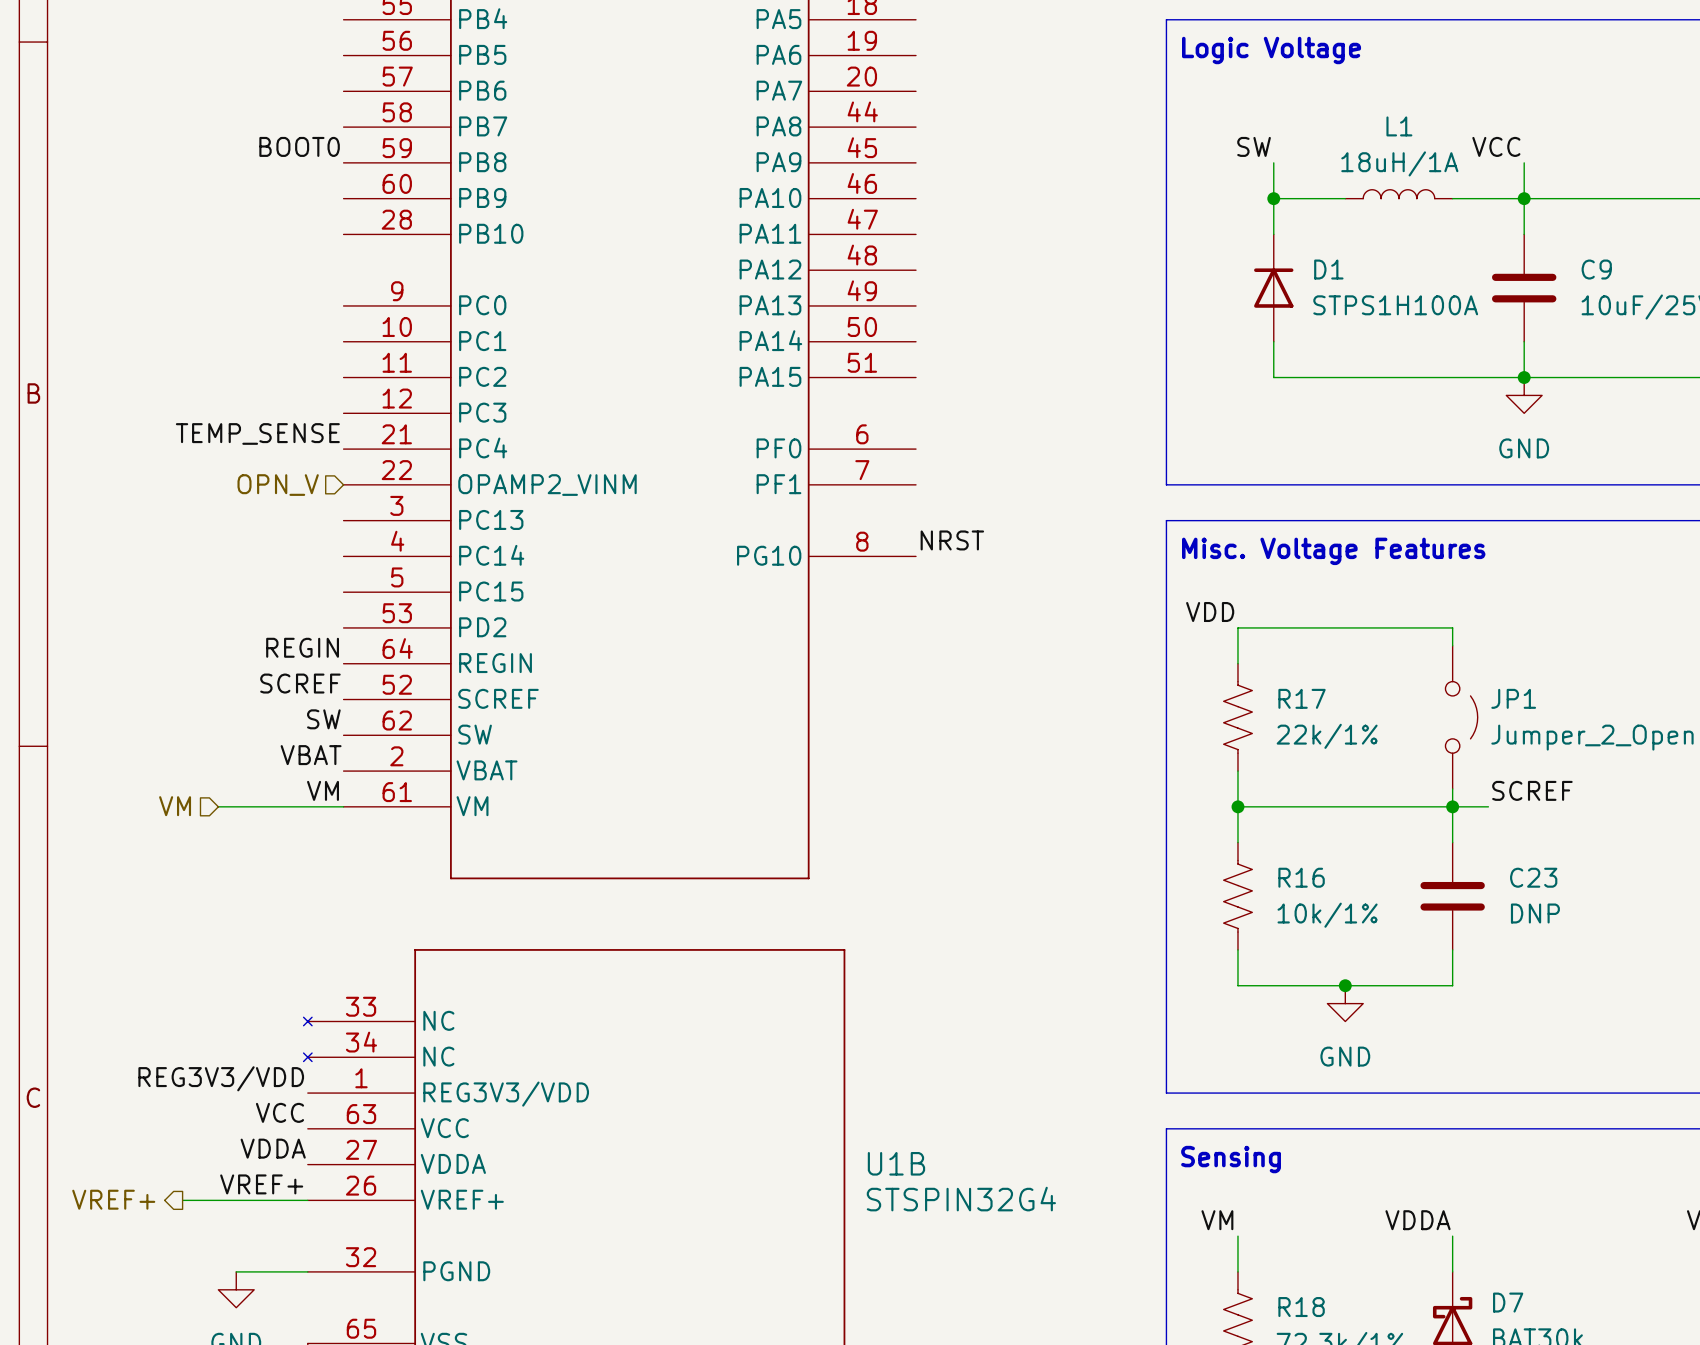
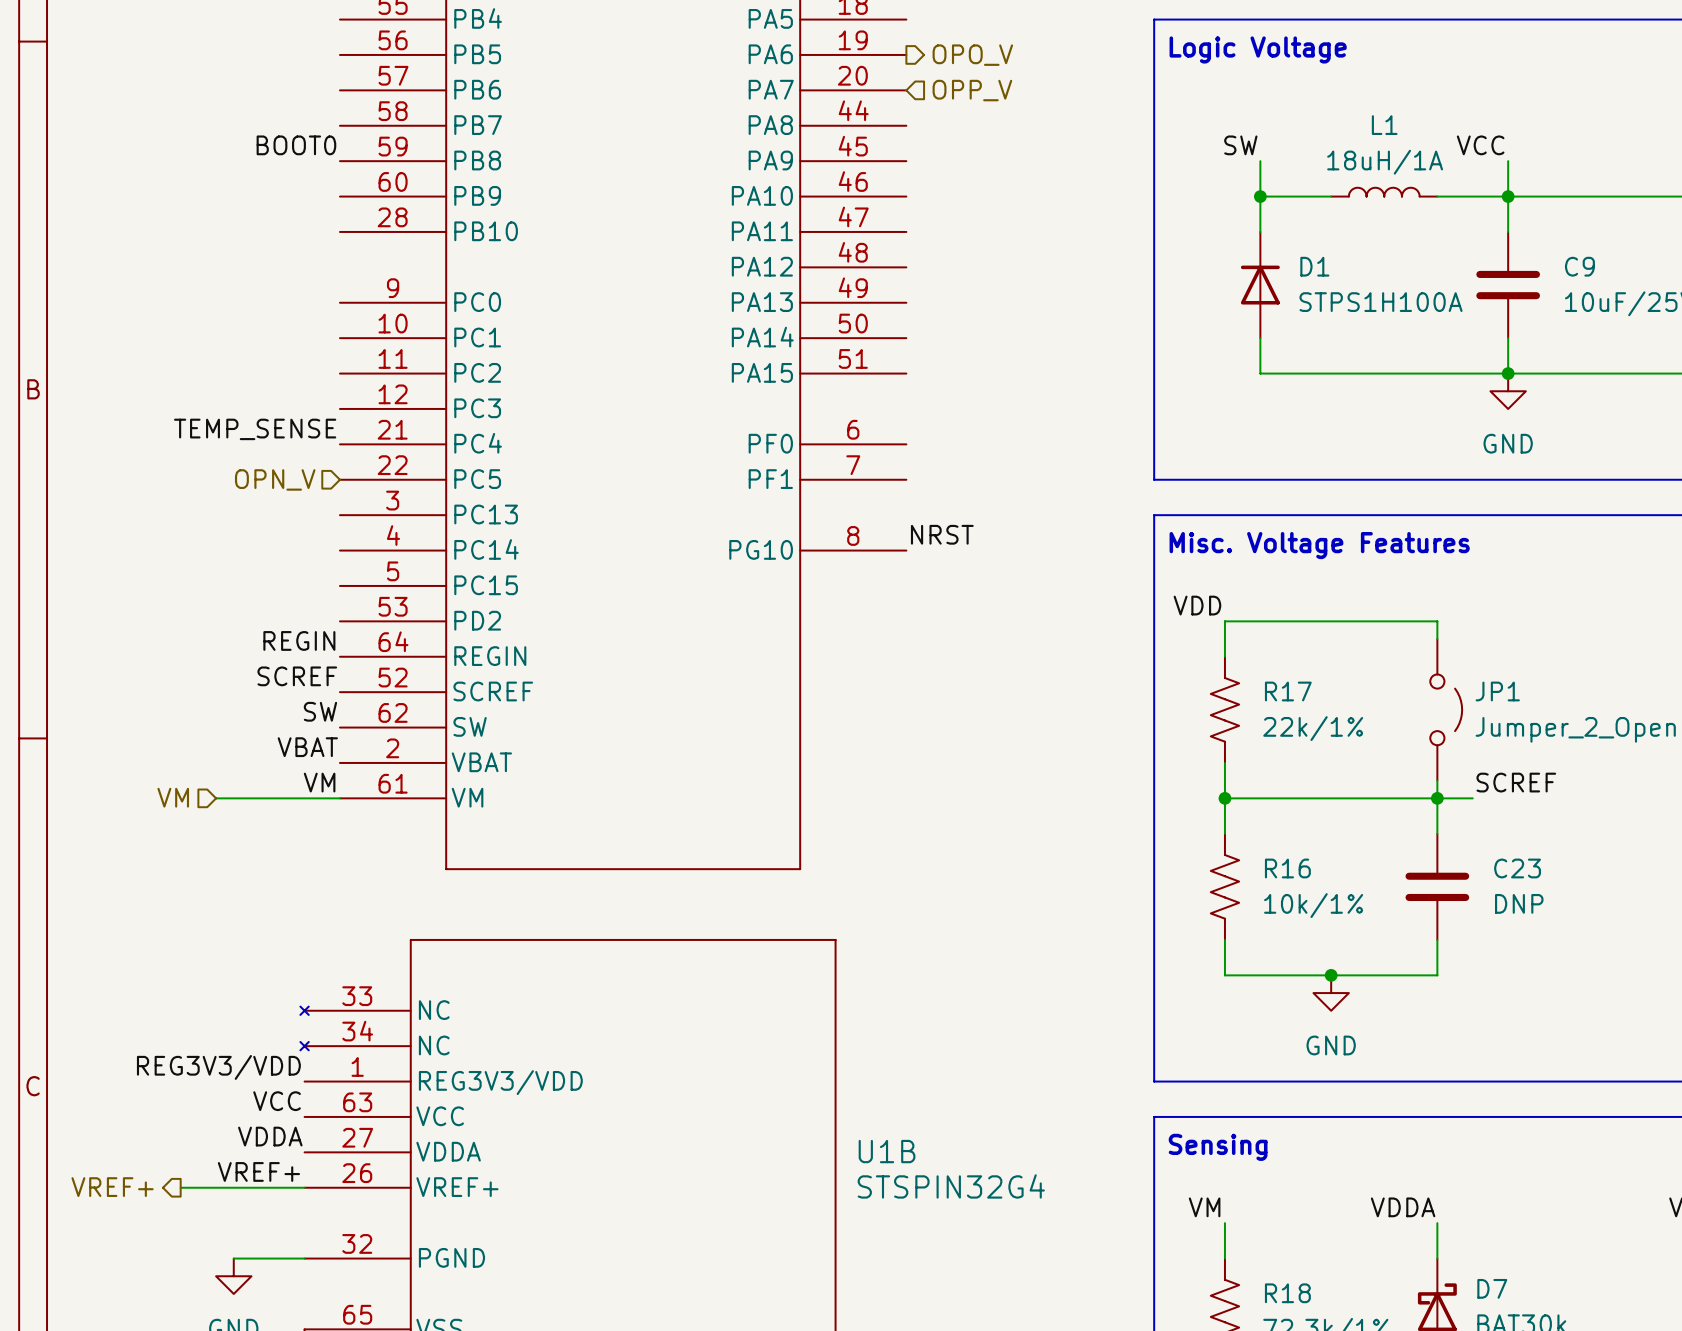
hierarchical label: none -> OPO_V (972, 55)
hierarchical label: none -> OPP_V (972, 90)
part pin name: OPAMP2_VINM (547, 485) -> PC5 (477, 479)

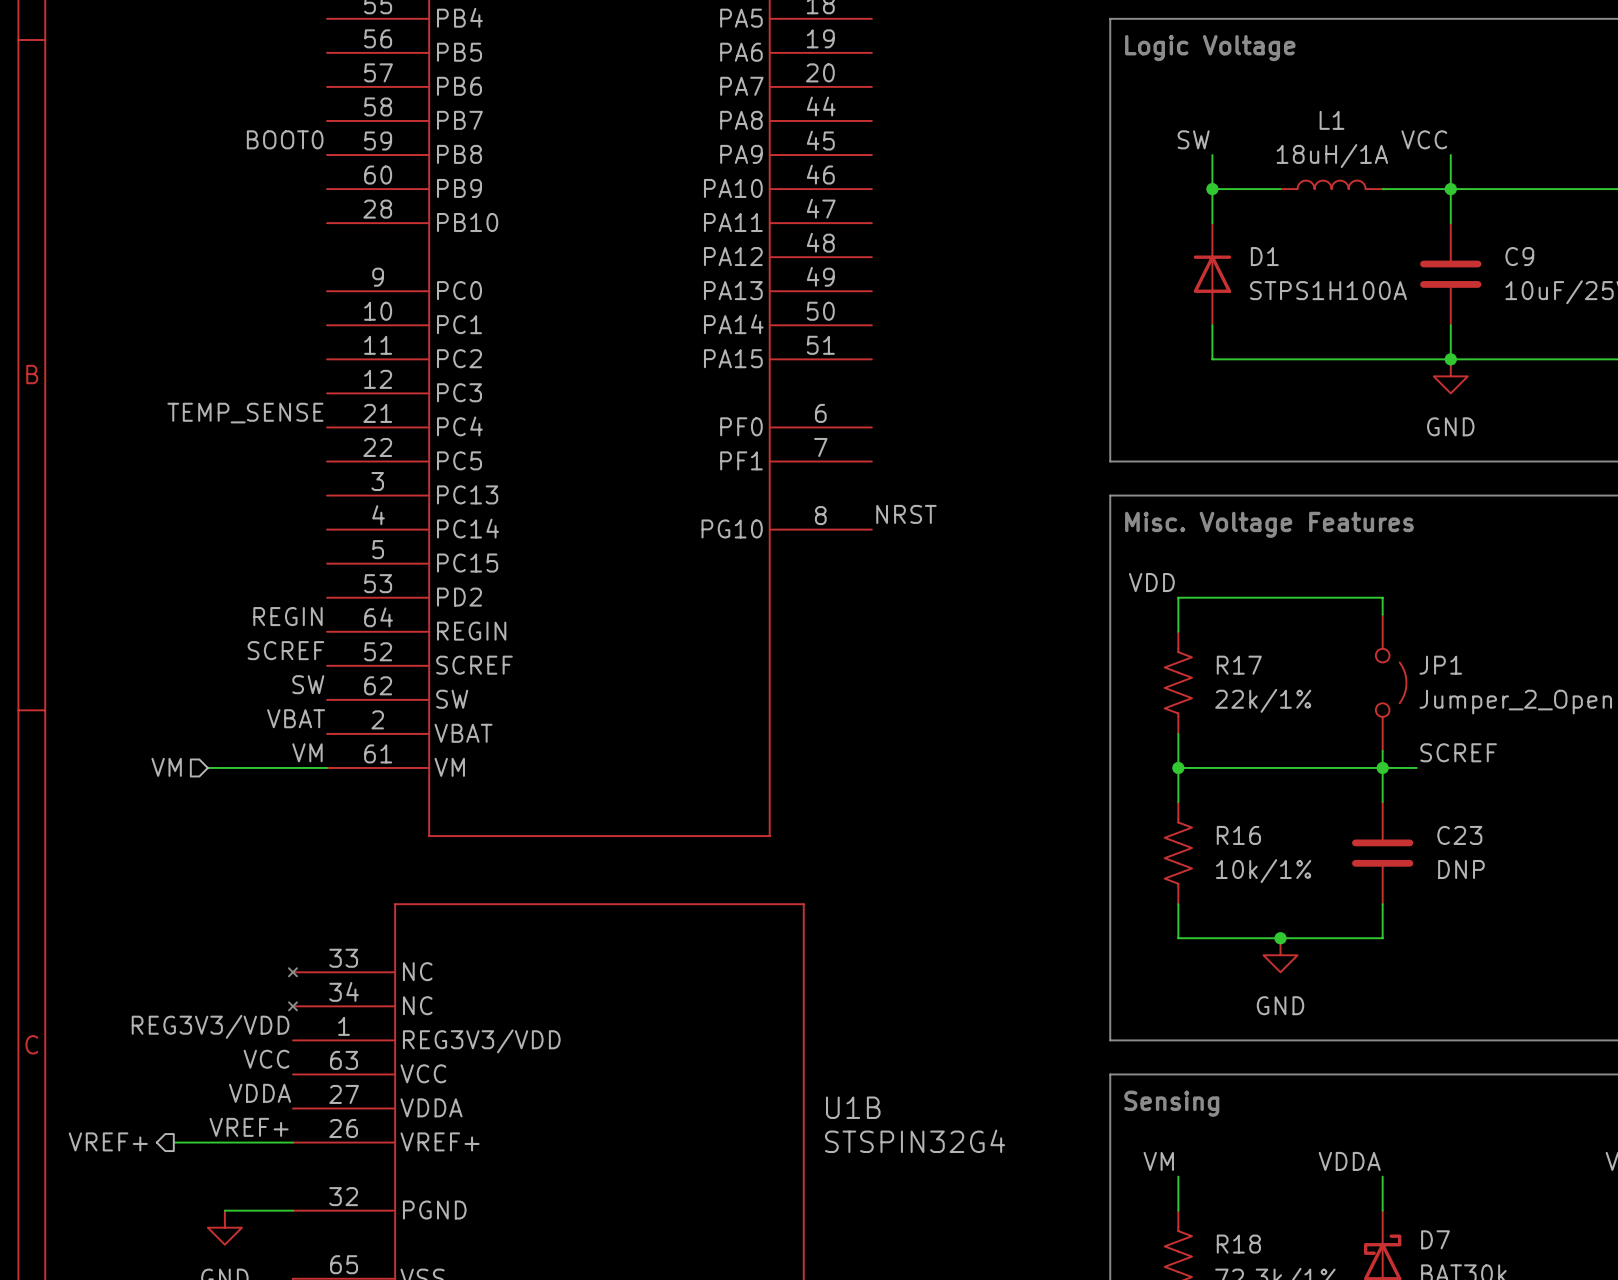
hierarchical label: OPO_V (972, 55) -> none
hierarchical label: OPP_V (972, 90) -> none
hierarchical label: OPN_V (275, 479) -> none

